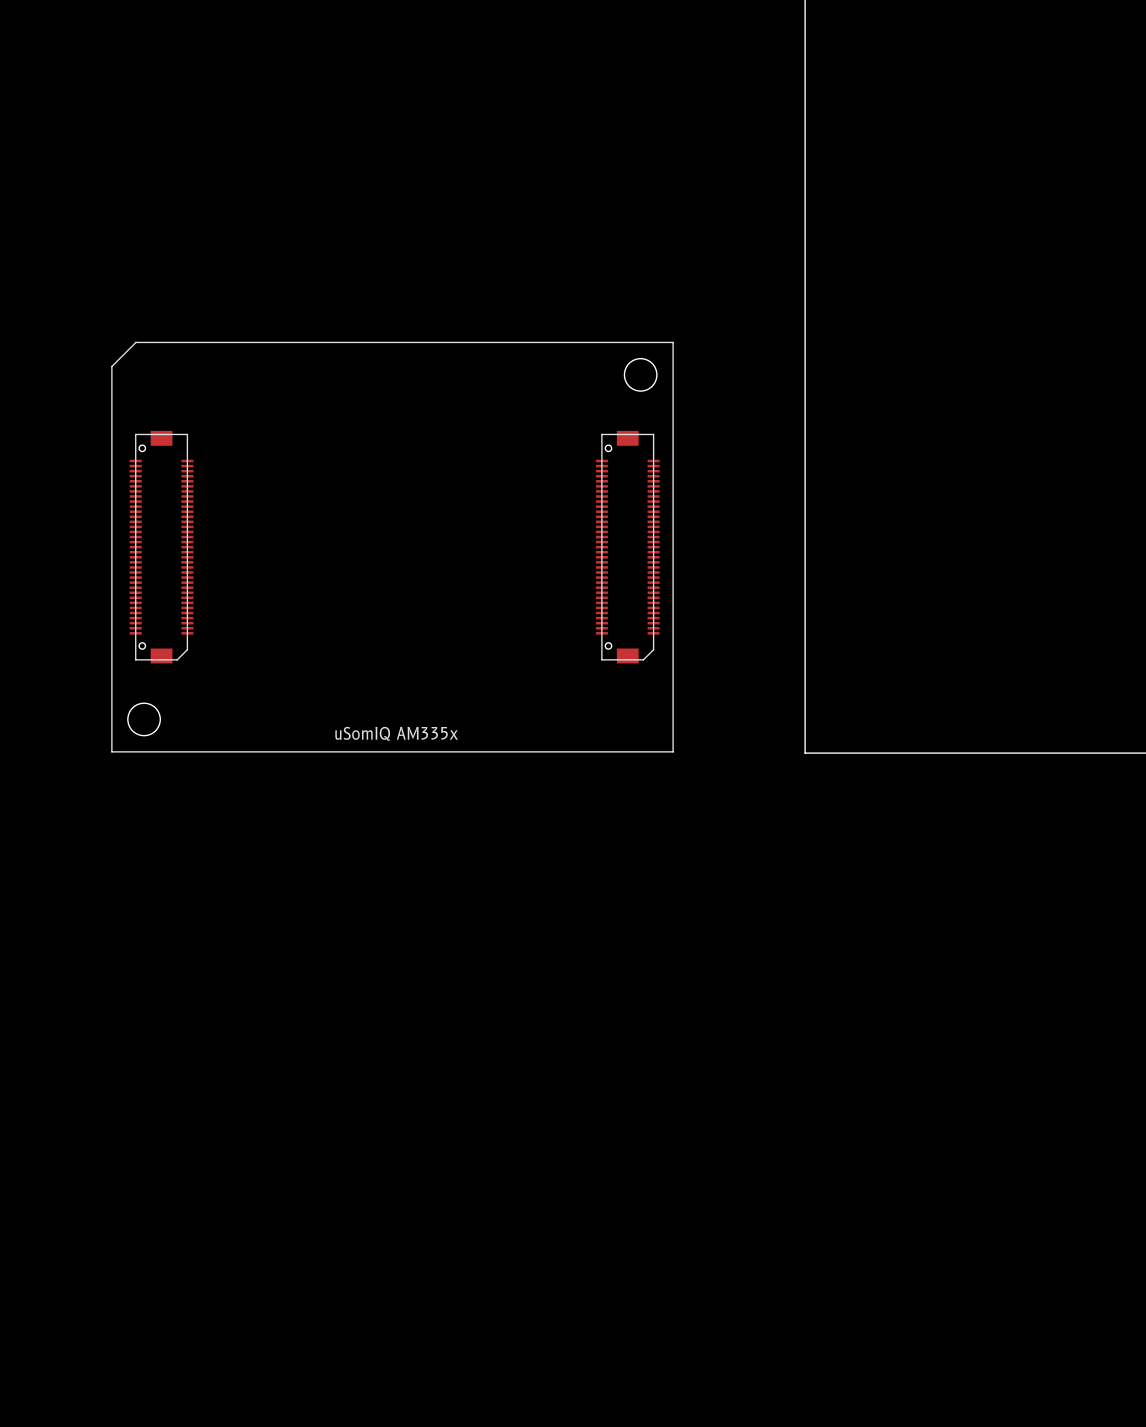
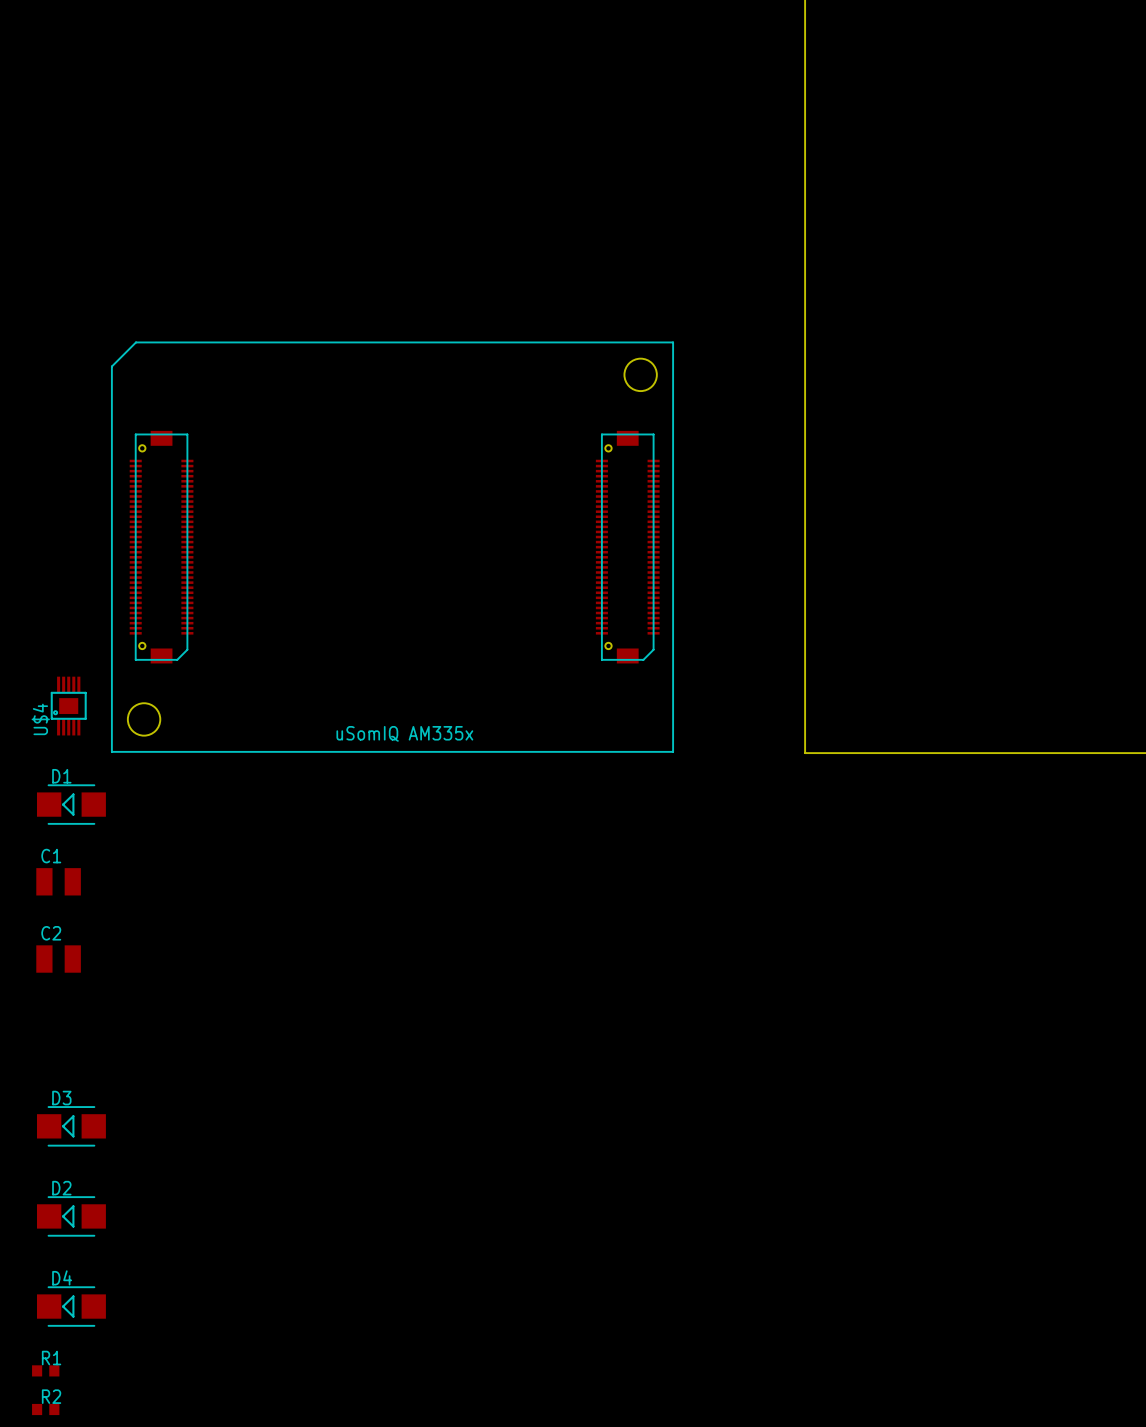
U$4: none -> (68, 706)
D1: none -> (71, 804)
C1: none -> (58, 881)
C2: none -> (58, 959)
D3: none -> (71, 1126)
D2: none -> (71, 1216)
D4: none -> (71, 1306)
R1: none -> (45, 1370)
R2: none -> (45, 1409)

